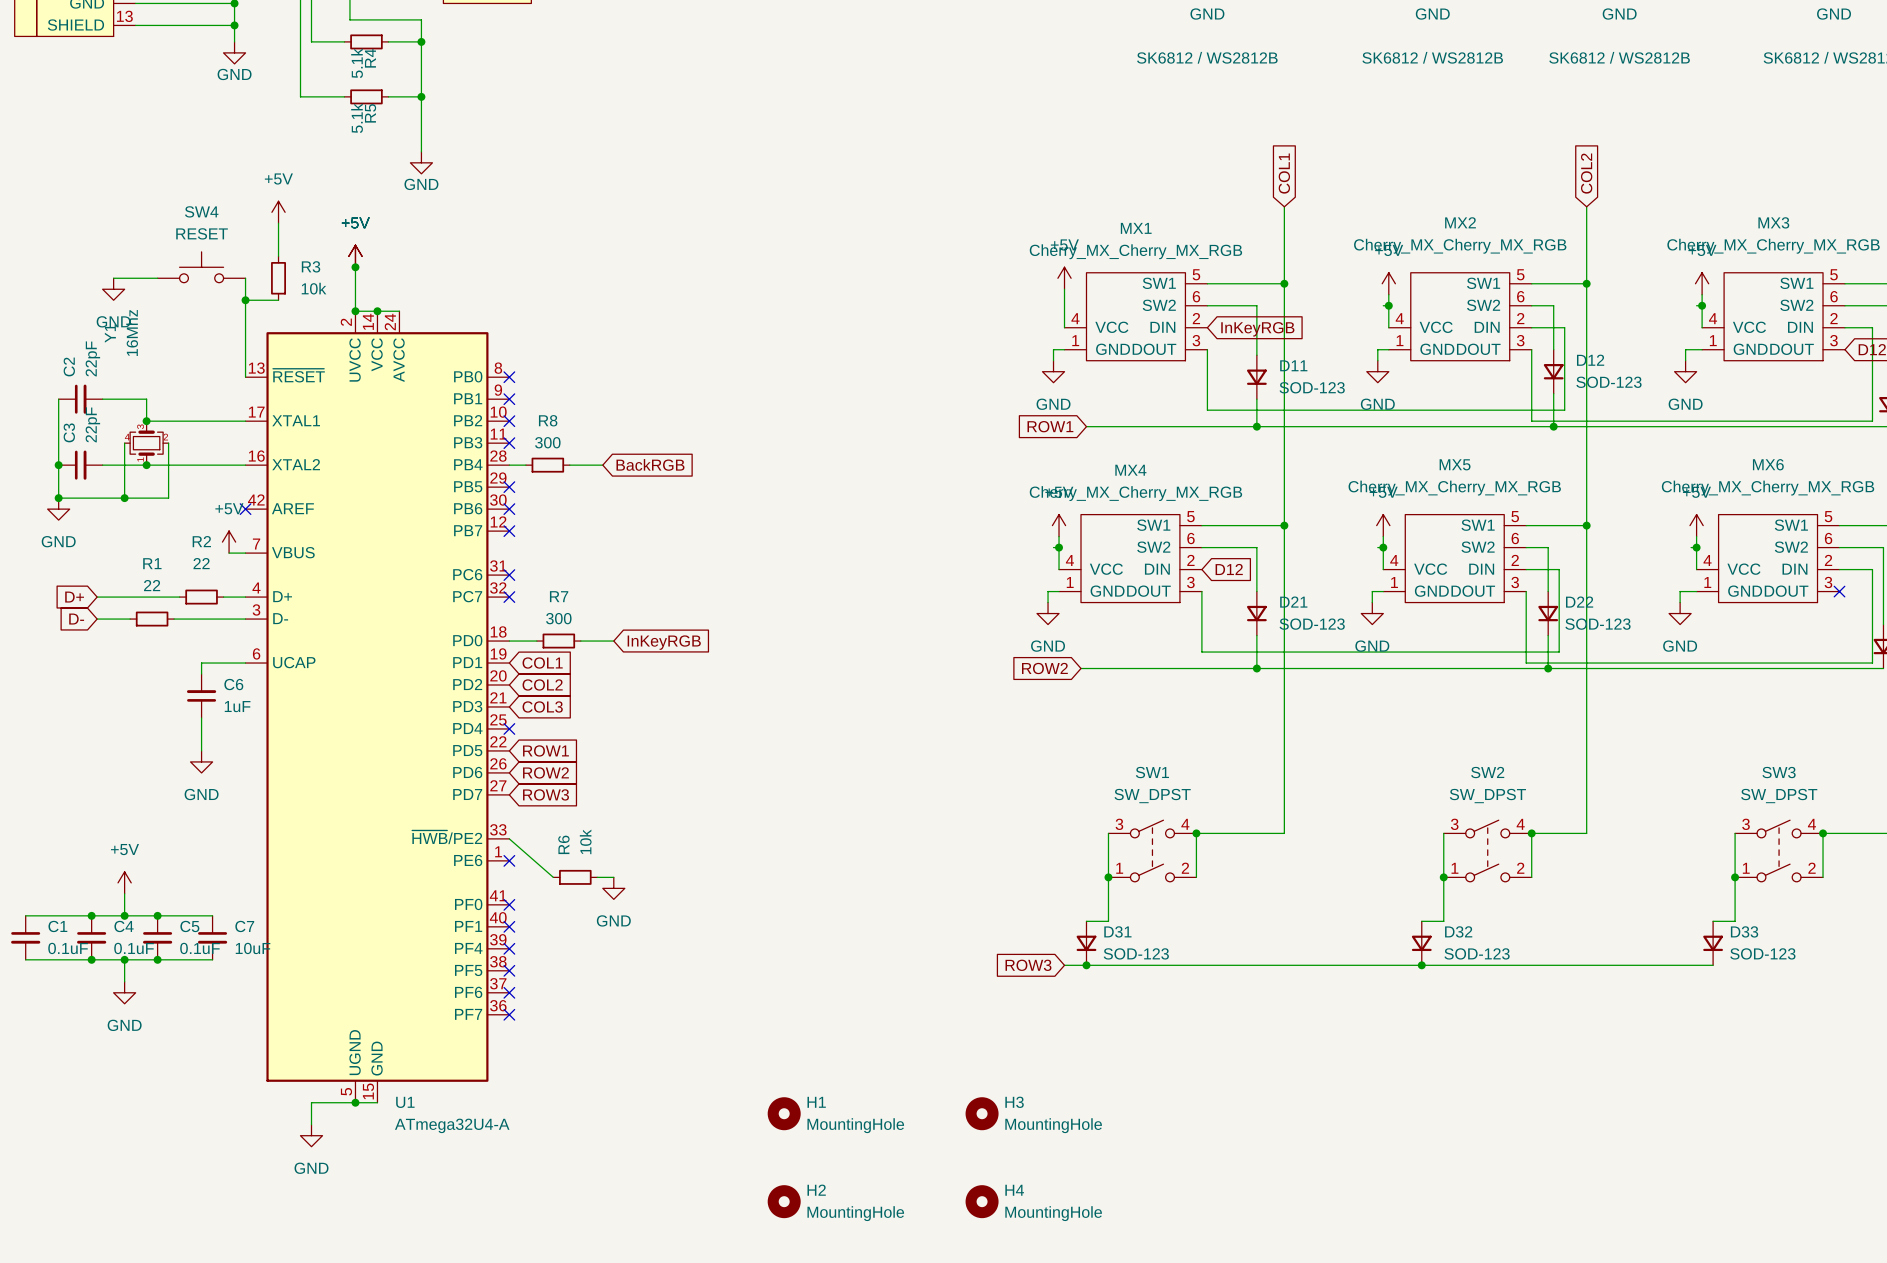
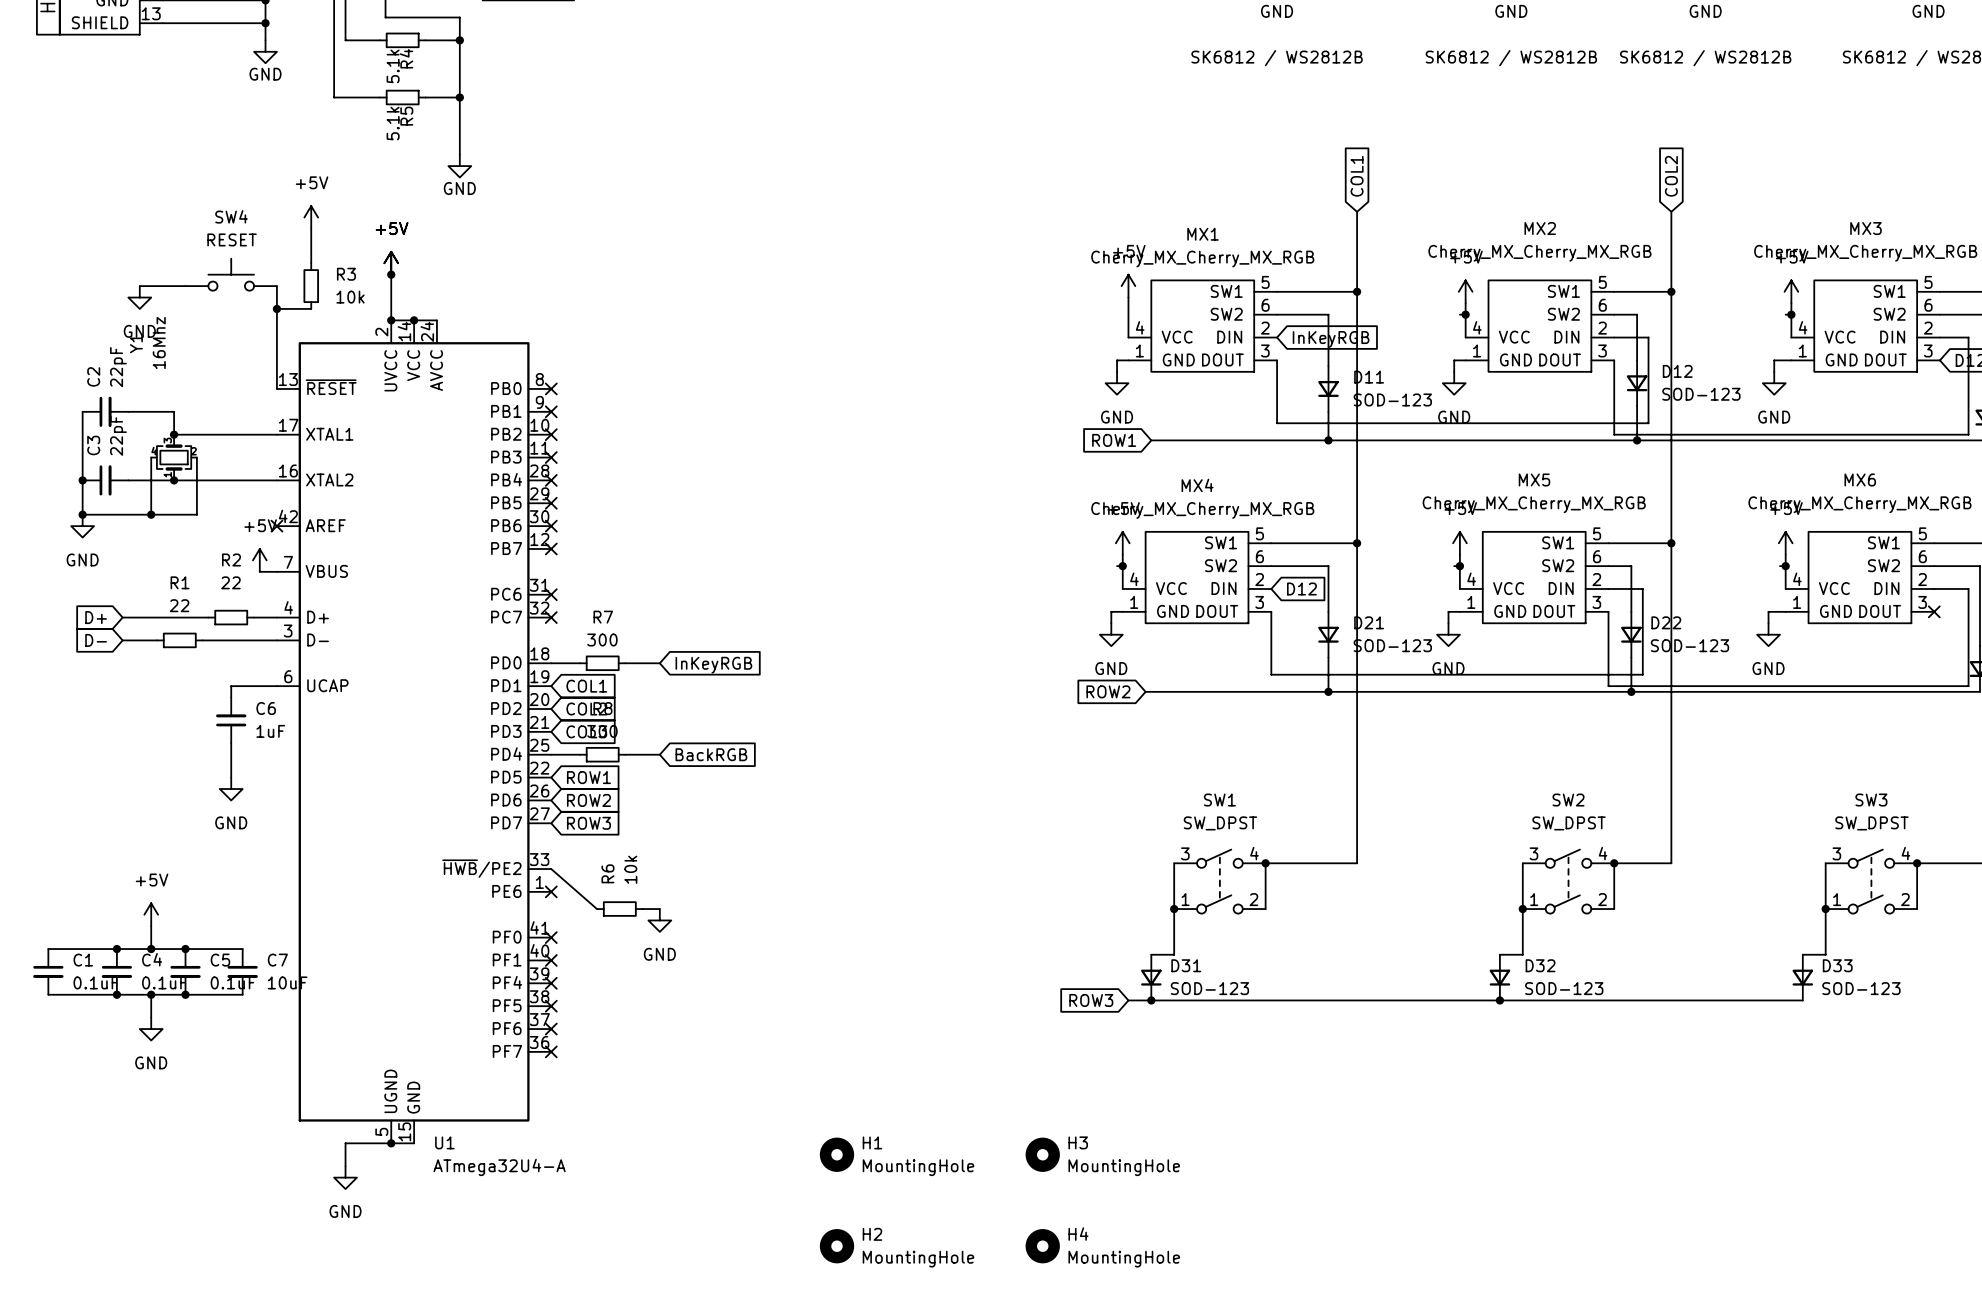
global label: BackRGB (650, 464) -> none
wire: (509, 465) (525, 465) -> none
no-connect mark: none -> (551, 480)
R8 position: (547, 465) -> (602, 754)
wire: (569, 465) (602, 465) -> none
wire: none -> (551, 754) (579, 754)
no-connect mark: (509, 728) -> none
wire: none -> (625, 754) (659, 754)
global label: none -> BackRGB (711, 754)

